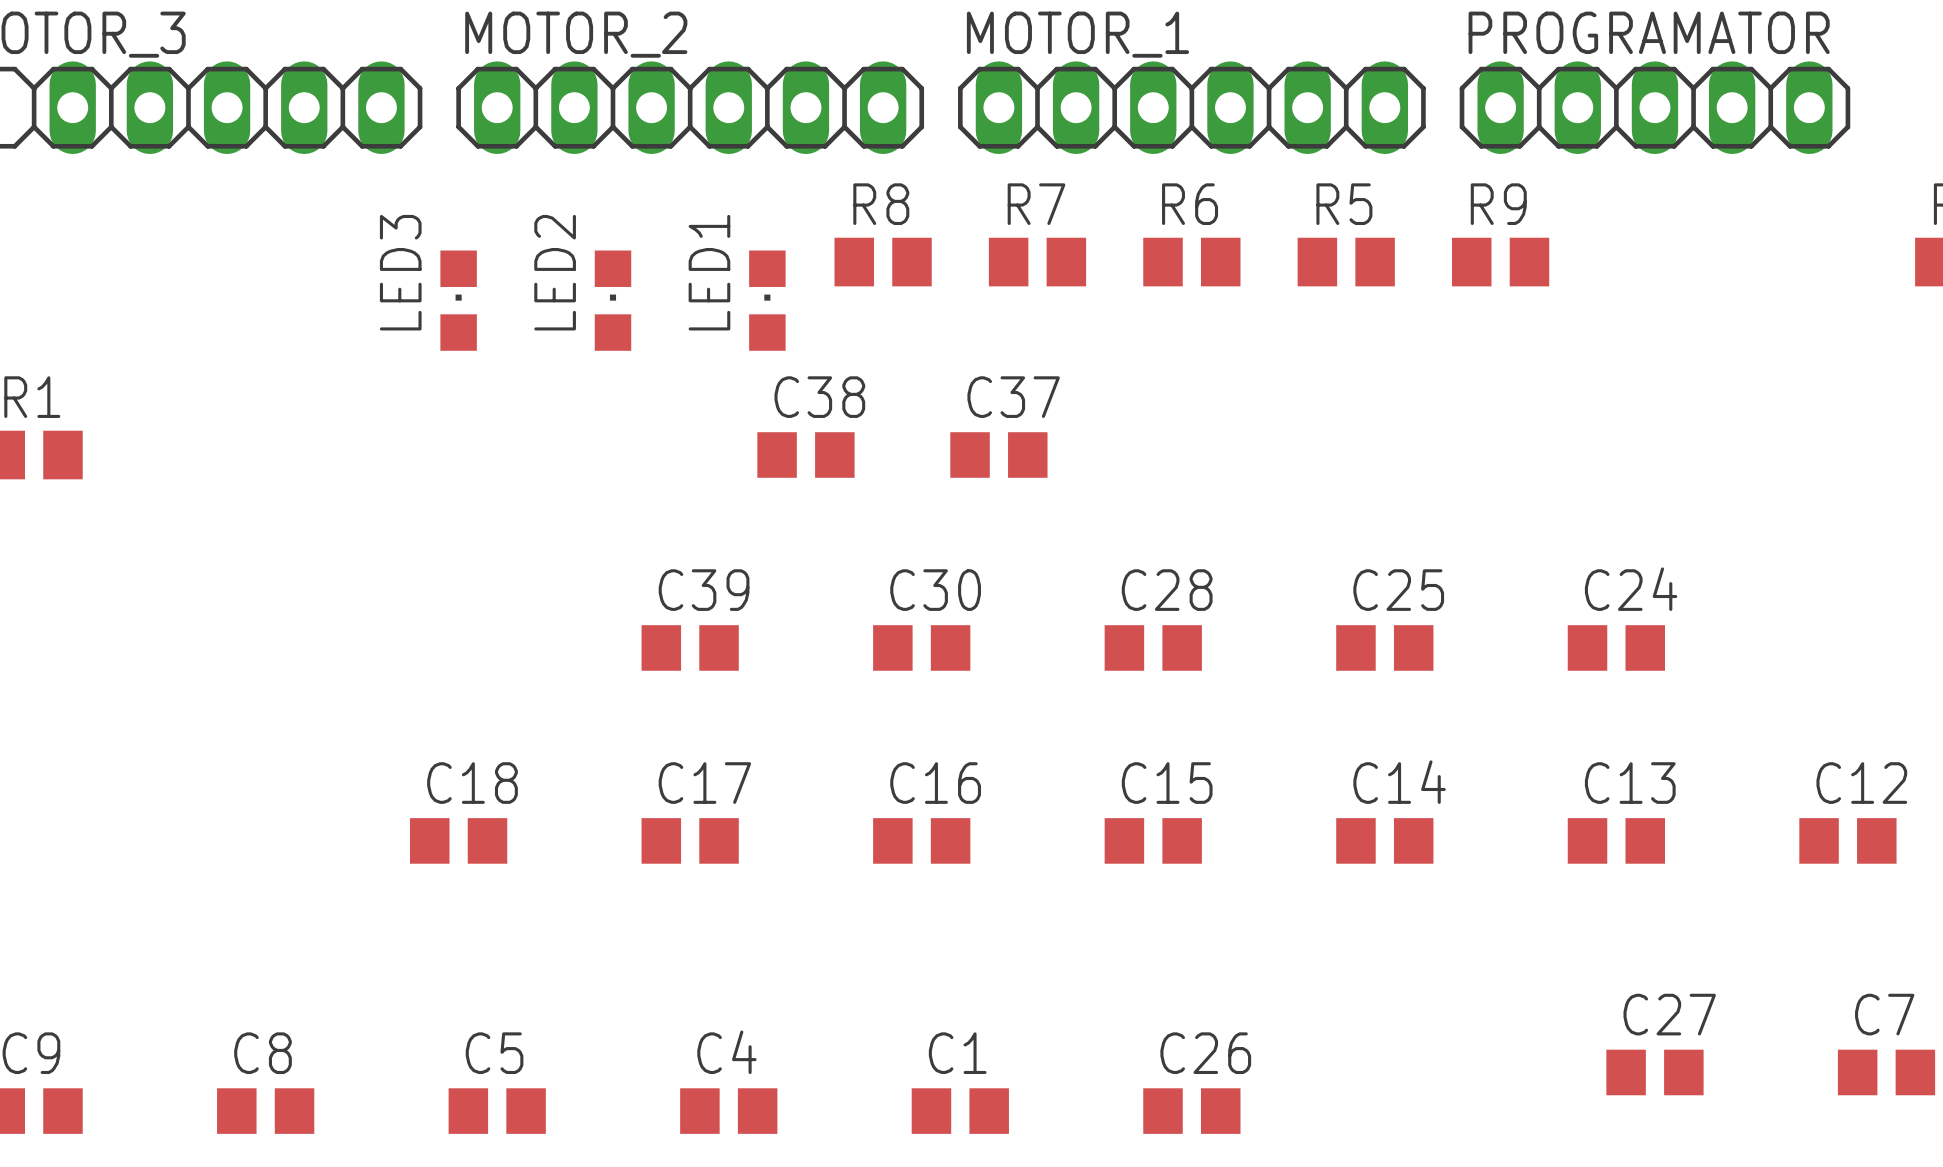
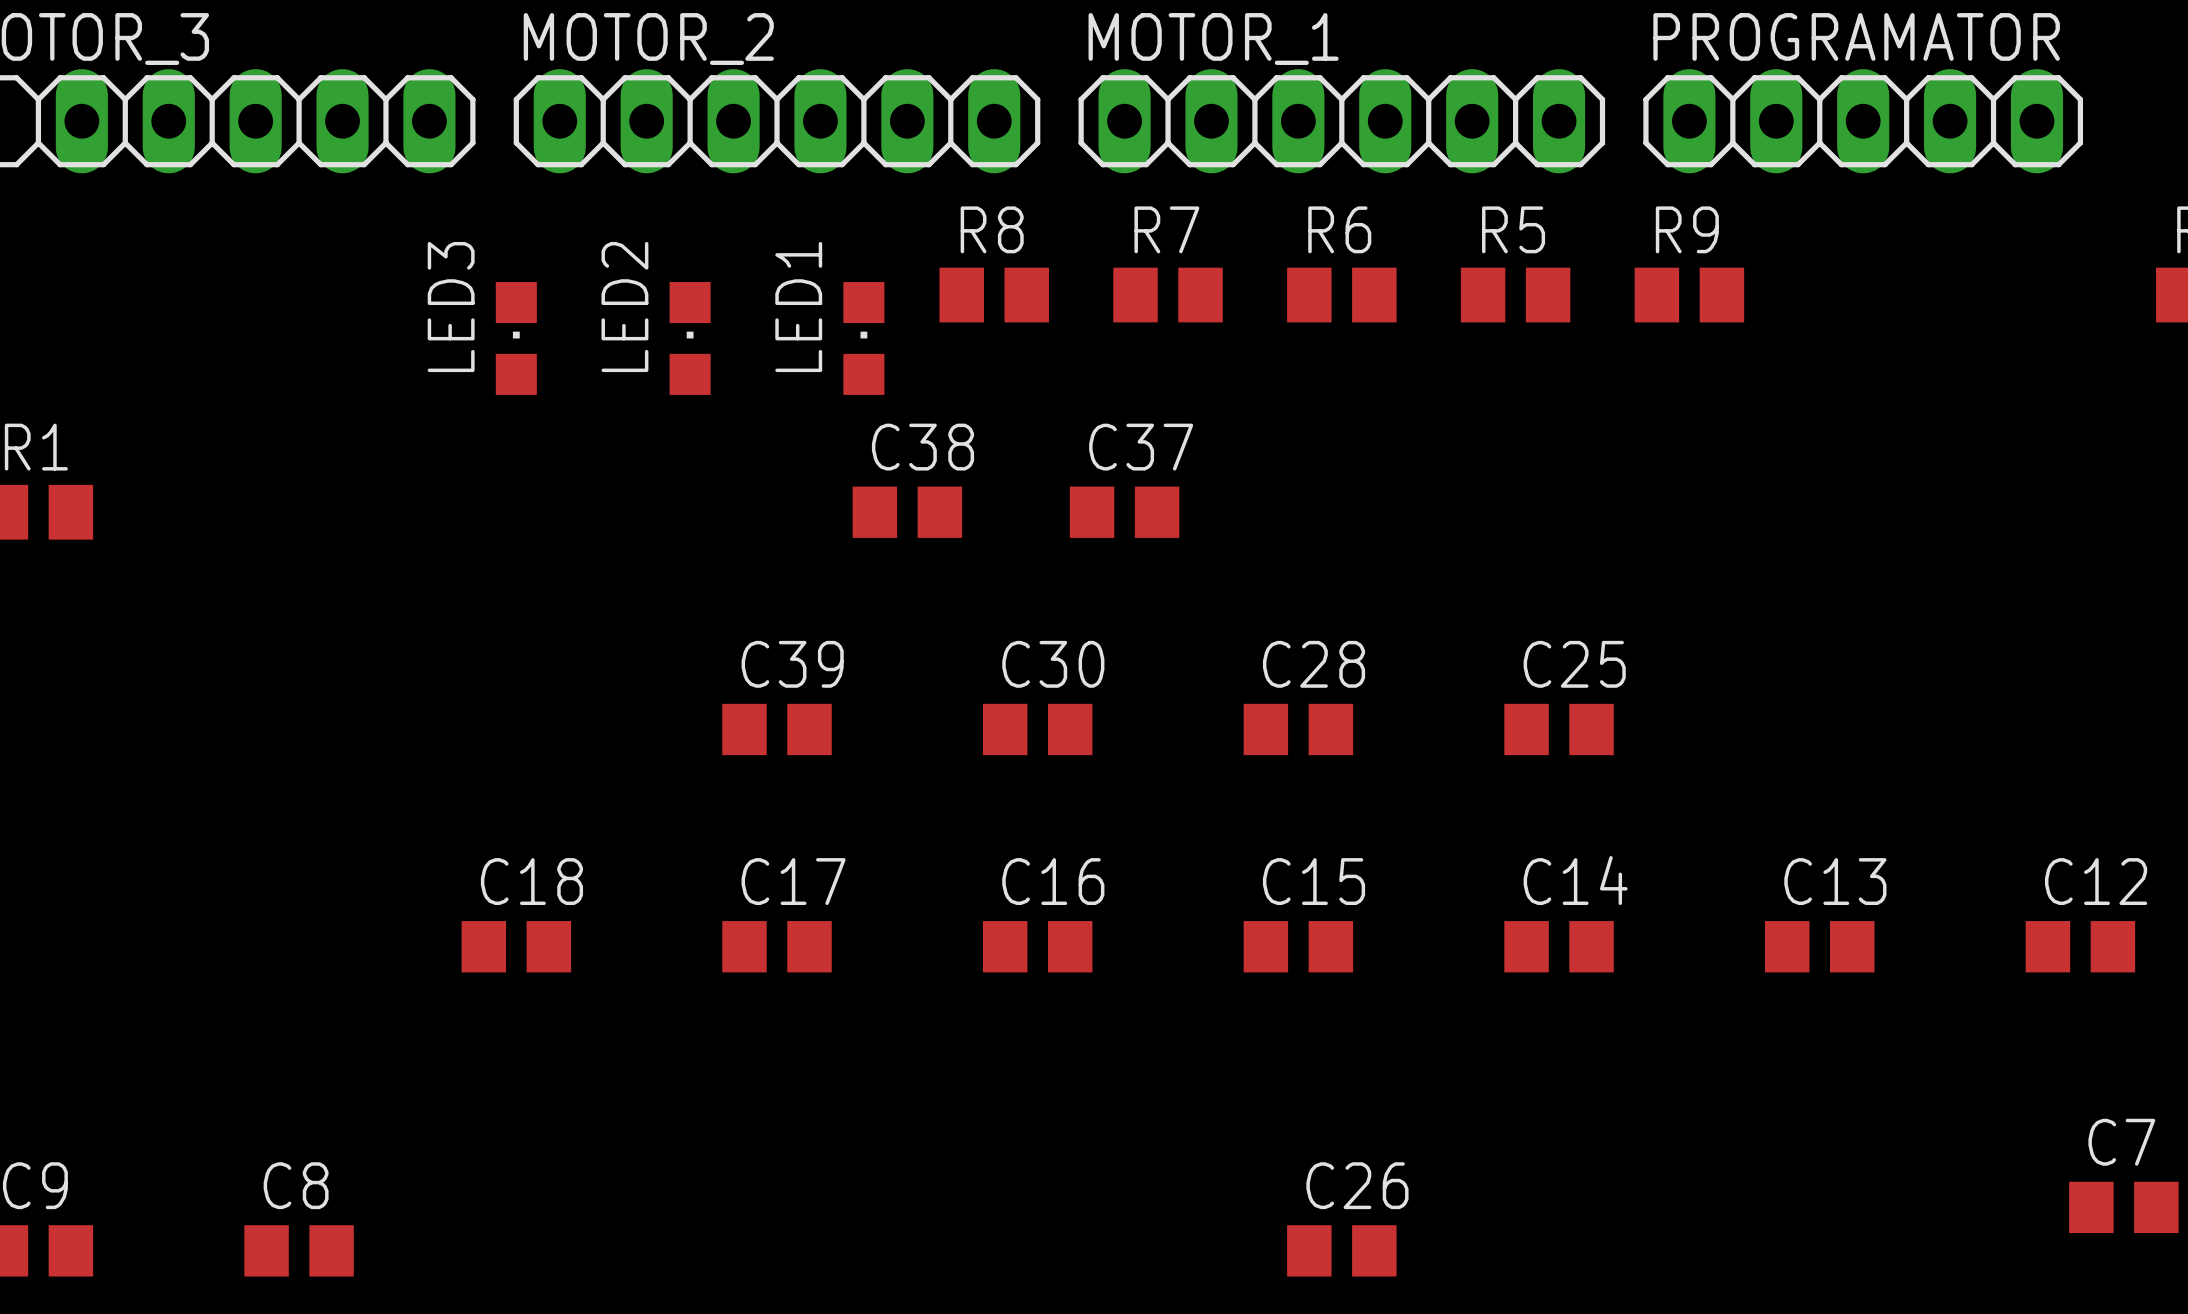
C24: (1616, 647) -> none
C27: (1654, 1072) -> none
C5: (497, 1111) -> none
C4: (728, 1111) -> none
C1: (960, 1111) -> none

